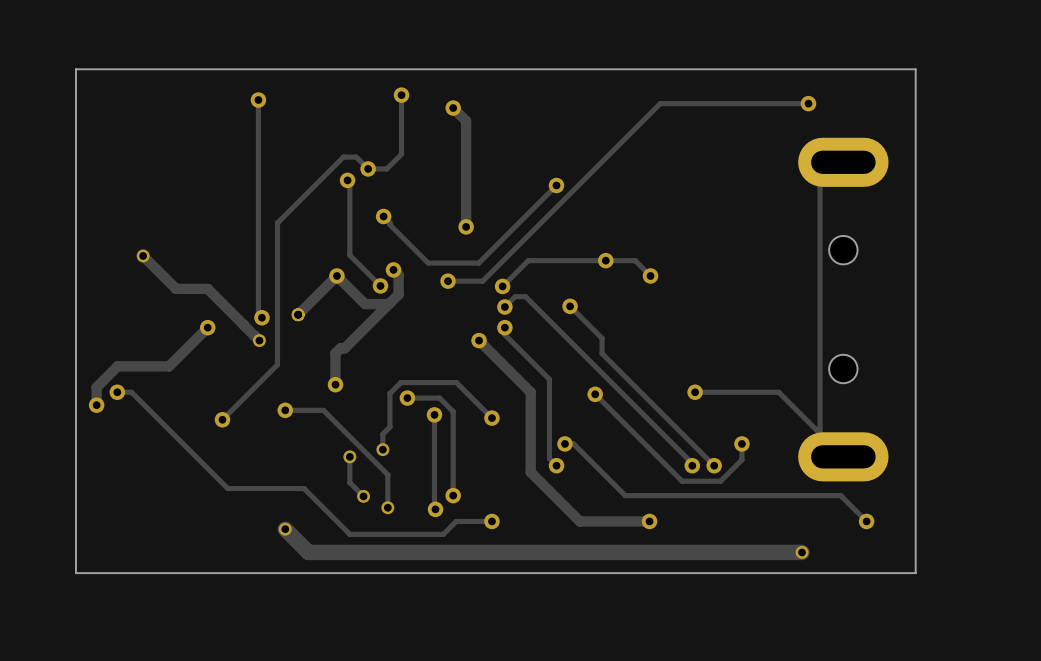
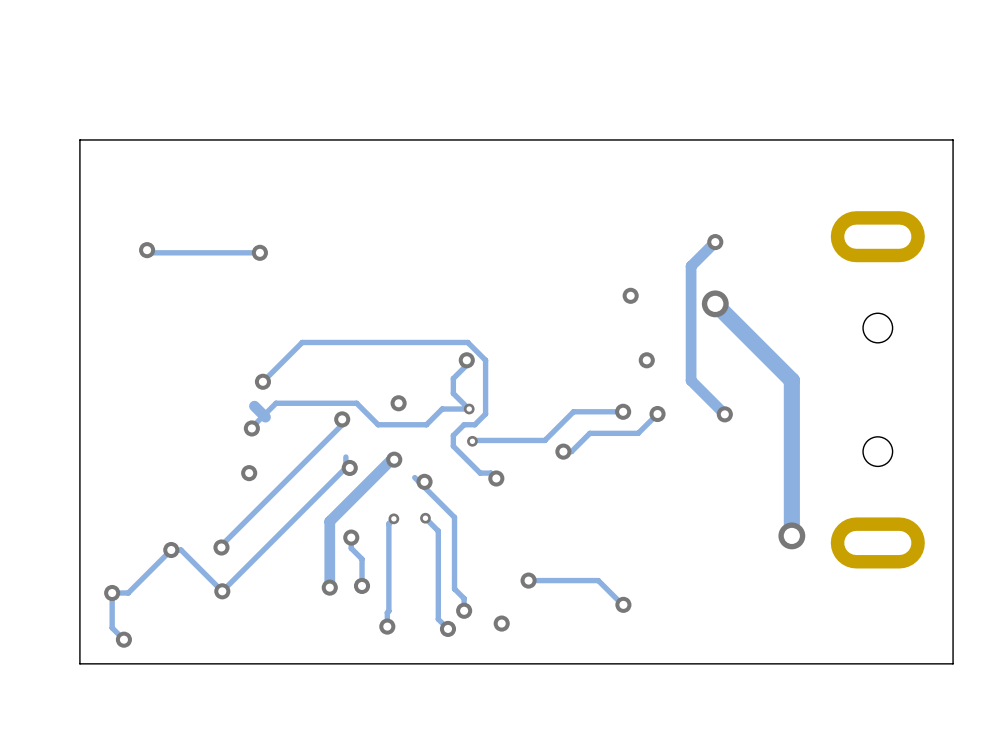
track: (401, 95) (401, 154) (386, 168) (368, 168) (356, 157) (343, 157) (277, 223) (277, 364) (222, 419) -> none
via: (401, 95) -> none
track: (258, 100) (258, 314) (261, 317) -> none
via: (258, 100) -> none
track: (808, 103) (660, 103) (482, 281) (448, 281) -> none
via: (808, 103) -> none
track: (453, 108) (466, 120) (466, 226) -> none
via: (453, 108) -> none
track: (843, 162) (820, 185) (820, 433) -> none
track: none -> (715, 242) (691, 266) (691, 380) (724, 414)
via: none -> (715, 242)
via: (368, 168) -> none
track: none -> (147, 250) (149, 252) (259, 252)
via: none -> (147, 250)
via: none -> (259, 252)
track: (347, 180) (349, 182) (349, 255) (380, 285) -> none
via: (347, 180) -> none
track: (556, 185) (478, 263) (428, 263) (383, 216) -> none
via: (556, 185) -> none
via: (383, 216) -> none
via: none -> (630, 295)
via: (466, 226) -> none
track: none -> (715, 303) (791, 380) (791, 535)
via: none -> (715, 303)
track: (143, 255) (176, 288) (207, 288) (243, 325) -> none
via: (143, 255) -> none
via: (605, 260) -> none
track: (393, 269) (398, 275) (398, 294) (344, 348) (340, 348) (335, 353) (335, 384) -> none
via: (393, 269) -> none
via: (336, 275) -> none
track: (650, 275) (635, 260) (528, 260) (502, 286) -> none
via: (650, 275) -> none
via: none -> (646, 360)
track: none -> (468, 363) (453, 378) (453, 393) (468, 409)
via: (380, 285) -> none
via: (502, 286) -> none
track: none -> (262, 381) (302, 342) (467, 342) (485, 360) (485, 414) (474, 424) (464, 424) (453, 435) (453, 446) (480, 473) (490, 473) (496, 478)
via: none -> (262, 381)
track: (388, 304) (365, 304) (336, 275) (298, 314) -> none
track: (504, 306) (515, 296) (525, 296) (692, 463) (692, 465) -> none
via: (504, 306) -> none
track: (570, 306) (602, 338) (602, 353) (714, 465) -> none
via: (570, 306) -> none
via: (298, 314) -> none
via: (261, 317) -> none
via: none -> (398, 403)
track: (207, 327) (168, 366) (117, 366) (96, 387) (96, 405) -> none
via: (207, 327) -> none
track: (504, 327) (504, 334) (549, 379) (549, 458) (556, 465) -> none
via: (504, 327) -> none
track: none -> (469, 409) (442, 409) (426, 424) (378, 424) (356, 403) (276, 403) (251, 428)
via: none -> (469, 409)
track: none -> (623, 411) (573, 411) (544, 440) (472, 441)
via: none -> (623, 411)
track: none -> (657, 414) (638, 433) (589, 433) (571, 451) (563, 451)
via: none -> (657, 414)
via: none -> (724, 414)
track: none -> (342, 419) (342, 424) (221, 547)
via: none -> (342, 419)
via: (259, 340) -> none
track: (479, 340) (530, 392) (530, 472) (579, 521) (649, 521) -> none
via: (479, 340) -> none
via: none -> (251, 428)
via: none -> (472, 441)
via: none -> (563, 451)
track: none -> (345, 456) (345, 467) (222, 591) (181, 550) (171, 550) (128, 593) (112, 593) (112, 627) (123, 639)
track: none -> (394, 459) (391, 459) (329, 521) (329, 587)
via: none -> (394, 459)
via: none -> (249, 473)
track: (117, 392) (131, 392) (227, 488) (304, 488) (349, 534) (443, 534) (456, 521) (491, 521) -> none
via: (117, 392) -> none
track: (695, 392) (778, 392) (843, 456) -> none
via: (695, 392) -> none
track: none -> (414, 477) (454, 517) (454, 588) (464, 598) (464, 610)
via: none -> (496, 478)
track: (595, 394) (682, 481) (720, 481) (741, 459) (741, 443) -> none
via: (595, 394) -> none
track: (407, 398) (439, 398) (453, 411) (453, 495) -> none
via: (96, 405) -> none
track: (285, 410) (323, 410) (387, 474) (387, 507) -> none
via: (285, 410) -> none
track: (434, 414) (435, 509) -> none
via: (434, 414) -> none
track: (491, 418) (456, 382) (400, 382) (389, 393) (389, 427) (382, 434) (382, 449) -> none
via: (491, 418) -> none
via: (222, 419) -> none
track: none -> (393, 518) (388, 523) (387, 626)
via: none -> (393, 518)
track: none -> (425, 518) (438, 531) (438, 619) (447, 628)
via: none -> (425, 518)
via size: [734, 436, 750, 452] -> [778, 522, 806, 550]
track: (564, 443) (573, 443) (625, 495) (840, 495) (866, 521) -> none
via: (564, 443) -> none
via: (382, 449) -> none
track: none -> (351, 537) (351, 548) (362, 559) (362, 585)
track: (349, 456) (349, 482) (363, 496) -> none
via position: (349, 456) -> (351, 537)
via: none -> (221, 547)
via: none -> (171, 550)
via: (556, 465) -> none
via: (692, 465) -> none
via: (714, 465) -> none
track: none -> (528, 580) (598, 580) (623, 604)
via: none -> (528, 580)
via: (453, 495) -> none
via: (363, 496) -> none
via: none -> (362, 585)
via: none -> (329, 587)
via: none -> (222, 591)
via: none -> (112, 593)
via: (387, 507) -> none
via position: (435, 509) -> (464, 610)
via: none -> (623, 604)
via position: (491, 521) -> (501, 623)
via: (649, 521) -> none
via: (866, 521) -> none
track: (285, 529) (308, 552) (802, 552) -> none
via: (285, 529) -> none
via: none -> (387, 626)
via: none -> (447, 628)
via: none -> (123, 639)
via: (802, 552) -> none

